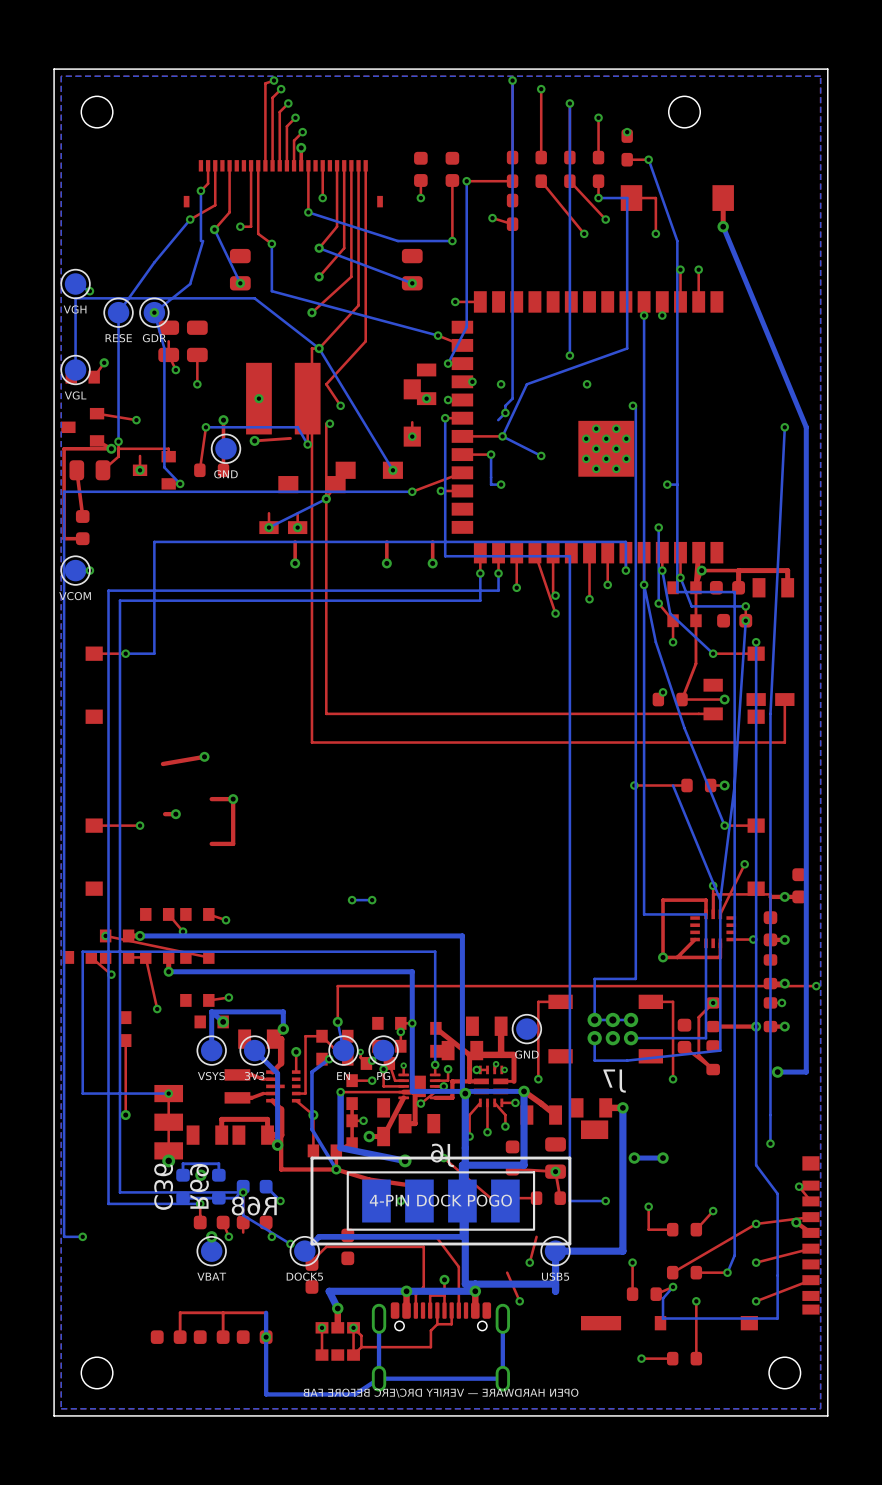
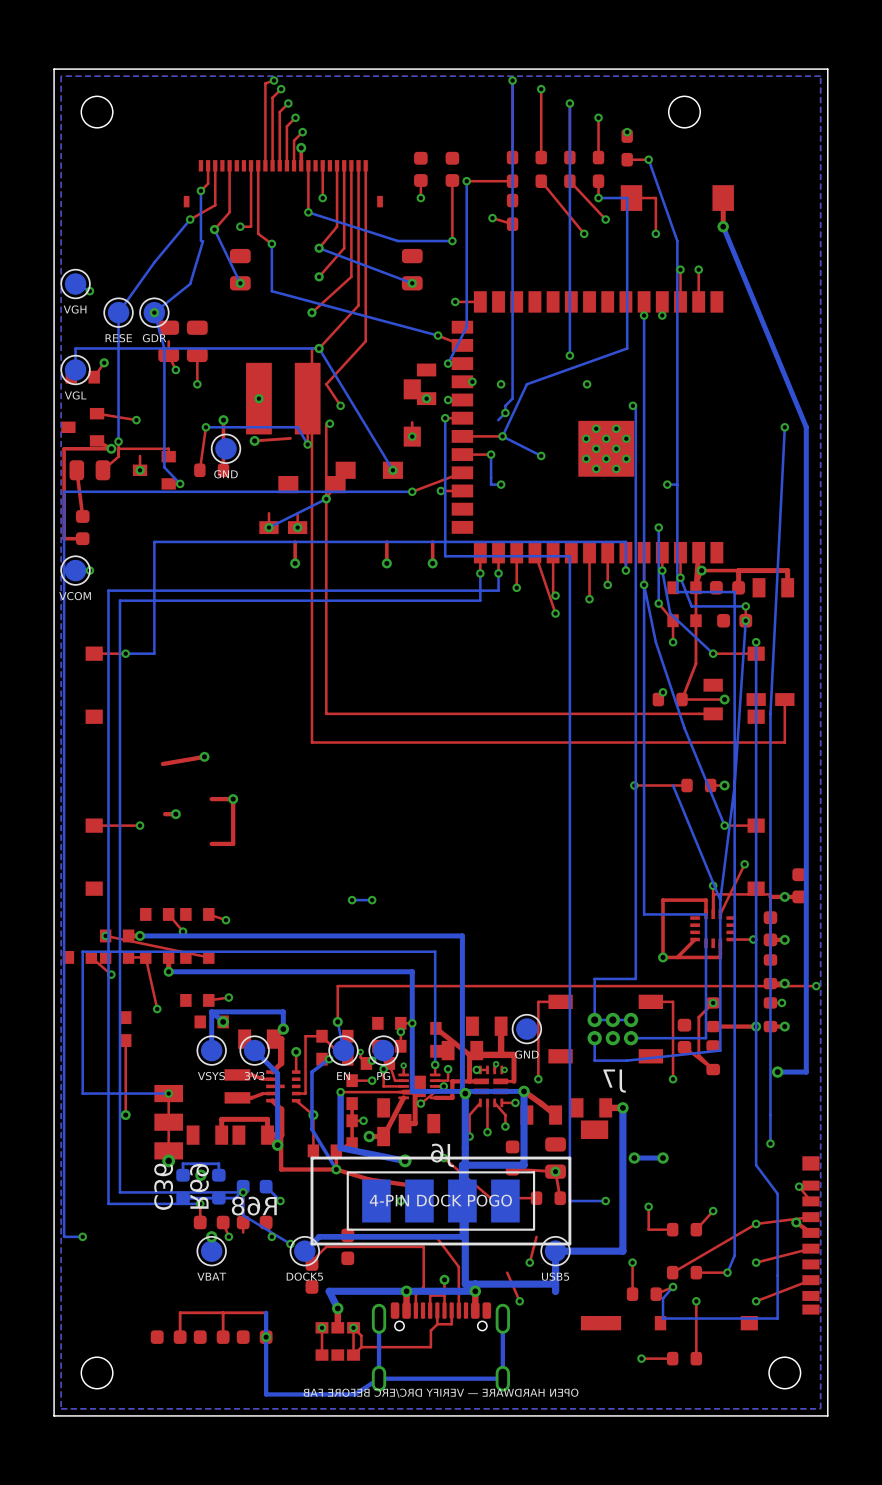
bottom track: (319, 348) (254, 298) (75, 298) (75, 348) -> (319, 348) (75, 348)

